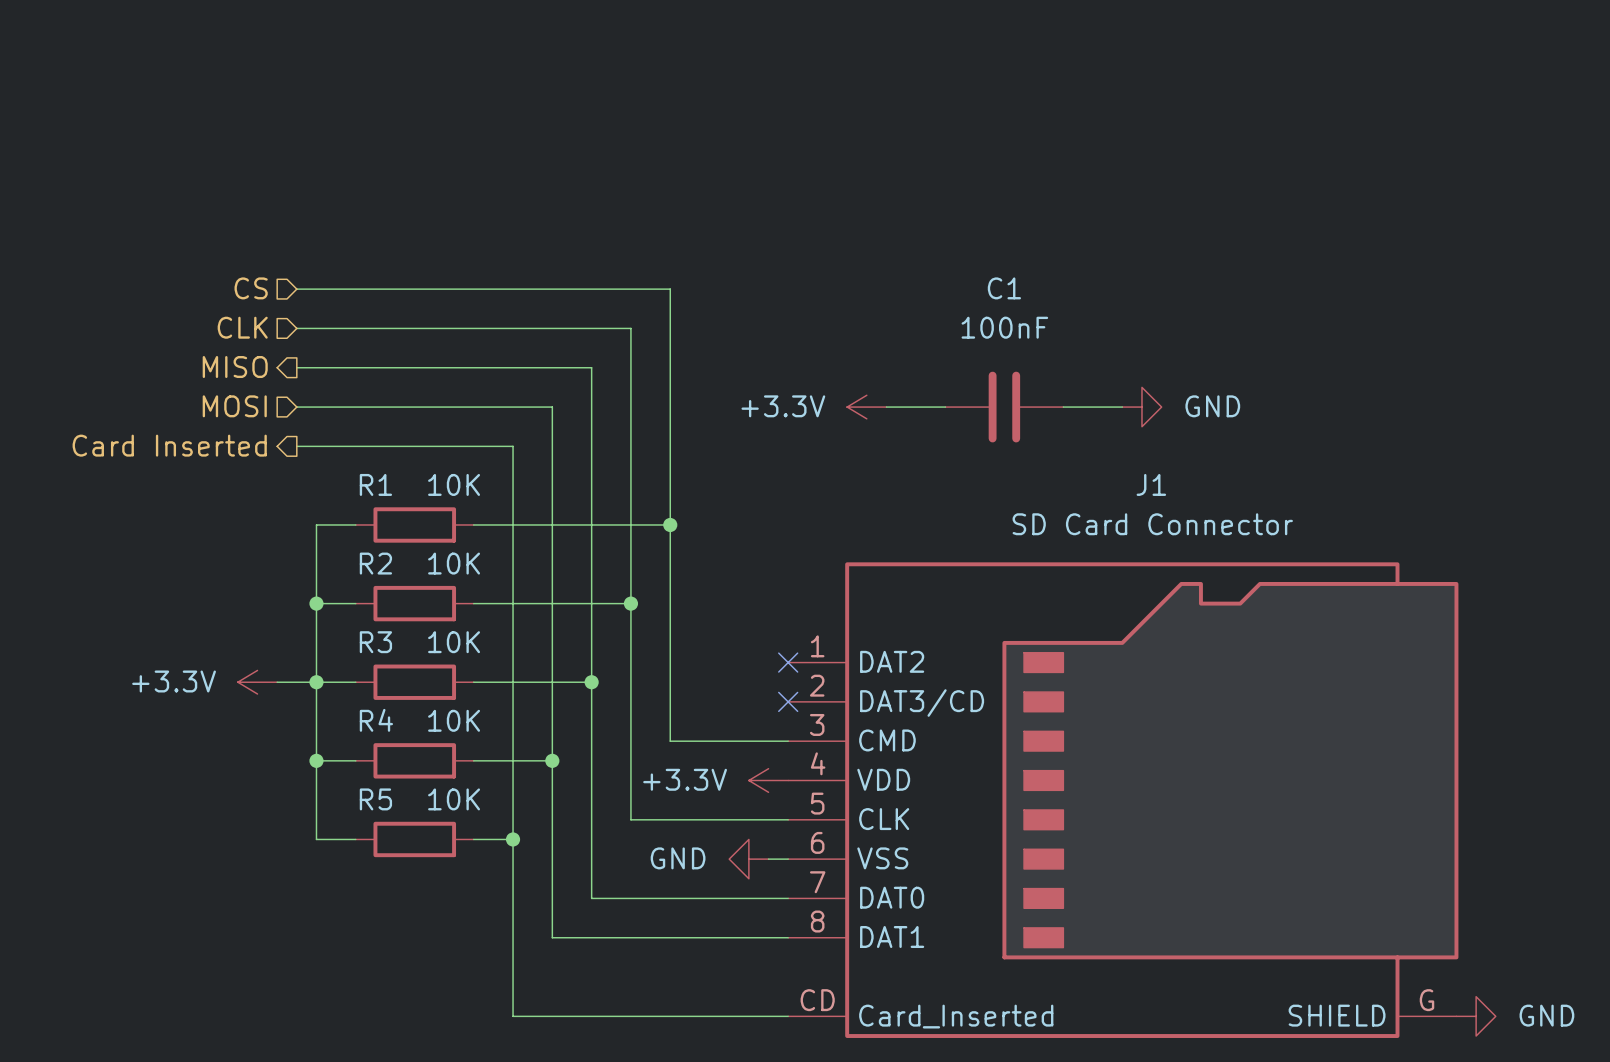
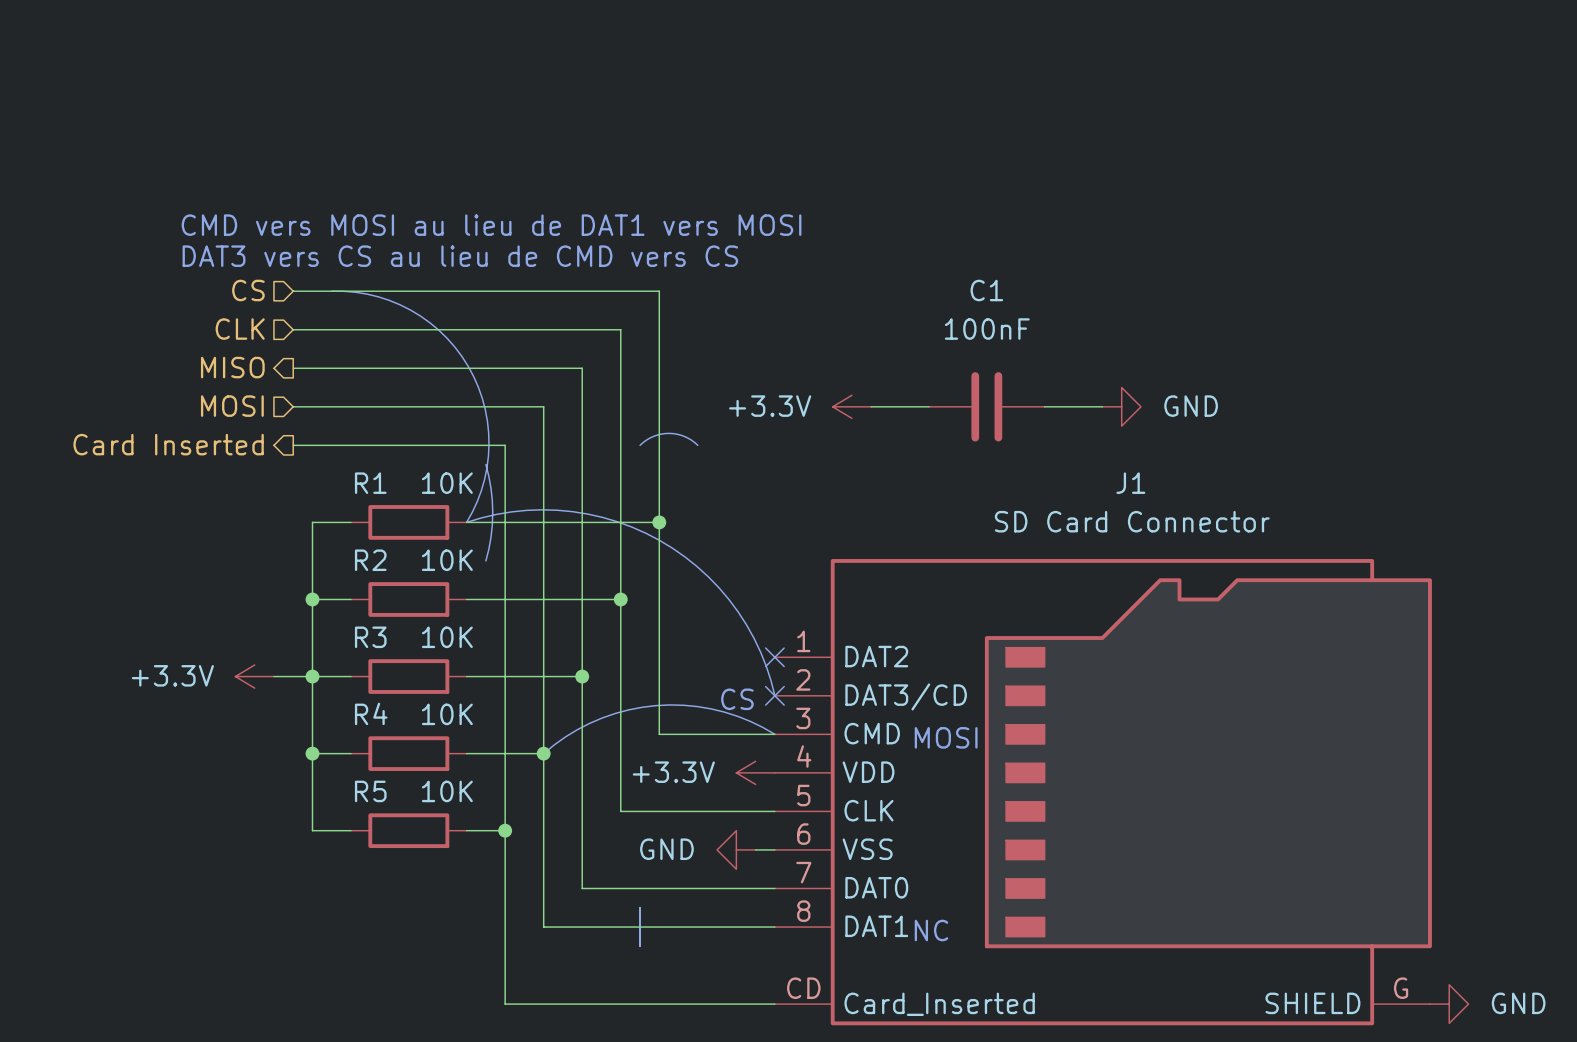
text: none -> CMD vers MOSI au lieu de DAT1 vers MOSI (491, 225)
text: none -> DAT3 vers CS au lieu de CMD vers CS (460, 256)
line: none -> (331, 291) (355, 292) (378, 296) (410, 310) (429, 322) (447, 338) (468, 366) (482, 398) (487, 421) (489, 444) (486, 467) (481, 490) (466, 522) (511, 511) (557, 510) (587, 514) (617, 521) (659, 540) (697, 566) (729, 599) (754, 638) (766, 666) (774, 695)
line: none -> (640, 445) (651, 437) (668, 433) (686, 437) (697, 445)
line: none -> (485, 464) (491, 488) (492, 512) (491, 537) (485, 560)
text: none -> CS (737, 699)
line: none -> (774, 734) (750, 721) (711, 708) (683, 705) (656, 705) (628, 709) (602, 717) (565, 736) (543, 753)
text: none -> MOSI (946, 737)
line: none -> (640, 907) (640, 946)
text: none -> NC (931, 930)

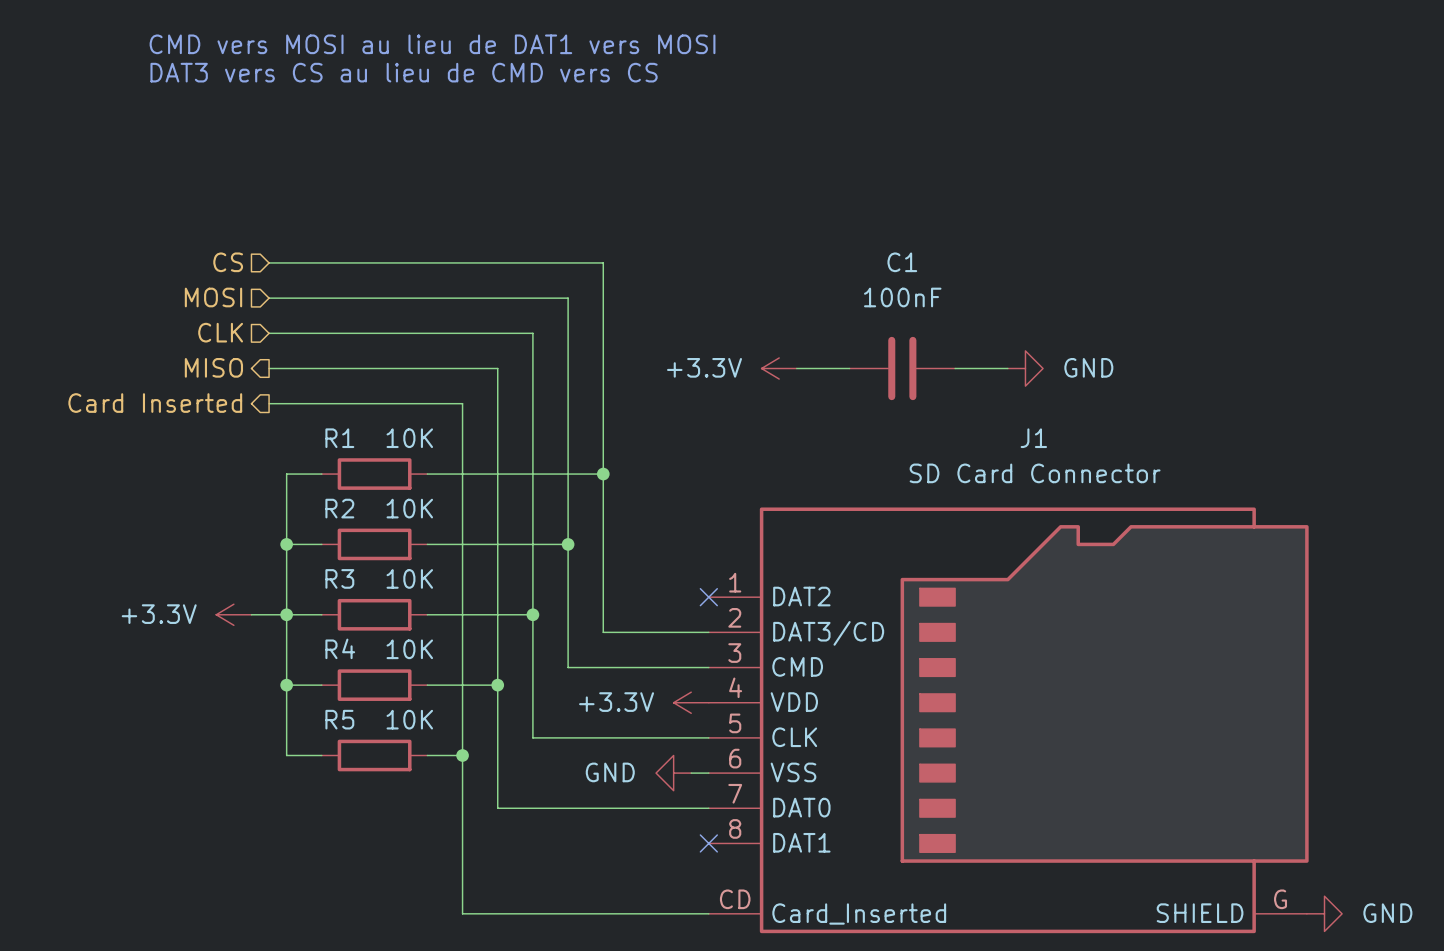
text position: CMD vers MOSI au lieu de DAT1 vers MOSI (491, 225) -> CMD vers MOSI au lieu de DAT1 vers MOSI (432, 44)
text position: DAT3 vers CS au lieu de CMD vers CS (460, 256) -> DAT3 vers CS au lieu de CMD vers CS (404, 72)
line: (331, 291) (355, 292) (378, 296) (410, 310) (429, 322) (447, 338) (468, 366) (482, 398) (487, 421) (489, 444) (486, 467) (481, 490) (466, 522) (511, 511) (557, 510) (587, 514) (617, 521) (659, 540) (697, 566) (729, 599) (754, 638) (766, 666) (774, 695) -> none
hierarchical label: CLK (240, 329) -> MOSI (213, 297)
hierarchical label shape: output (232, 367) -> input (220, 332)
hierarchical label: MISO (232, 367) -> CLK (220, 332)
hierarchical label shape: input (232, 406) -> output (213, 367)
hierarchical label: MOSI (232, 406) -> MISO (213, 367)
line: (640, 445) (651, 437) (668, 433) (686, 437) (697, 445) -> none
line: (485, 464) (491, 488) (492, 512) (491, 537) (485, 560) -> none
wire: (659, 695) (659, 734) -> (568, 667) (603, 667)
wire: none -> (603, 632) (708, 632)
no-connect mark: (774, 695) -> none
text: CS (737, 699) -> none
wire: (620, 734) (620, 811) -> (532, 737) (568, 737)
line: (774, 734) (750, 721) (711, 708) (683, 705) (656, 705) (628, 709) (602, 717) (565, 736) (543, 753) -> none
text: MOSI (946, 737) -> none
wire: (582, 811) (582, 888) -> (497, 808) (532, 808)
wire: (543, 888) (543, 927) (774, 927) -> none
line: (640, 907) (640, 946) -> none
no-connect mark: none -> (708, 843)
text: NC (931, 930) -> none

